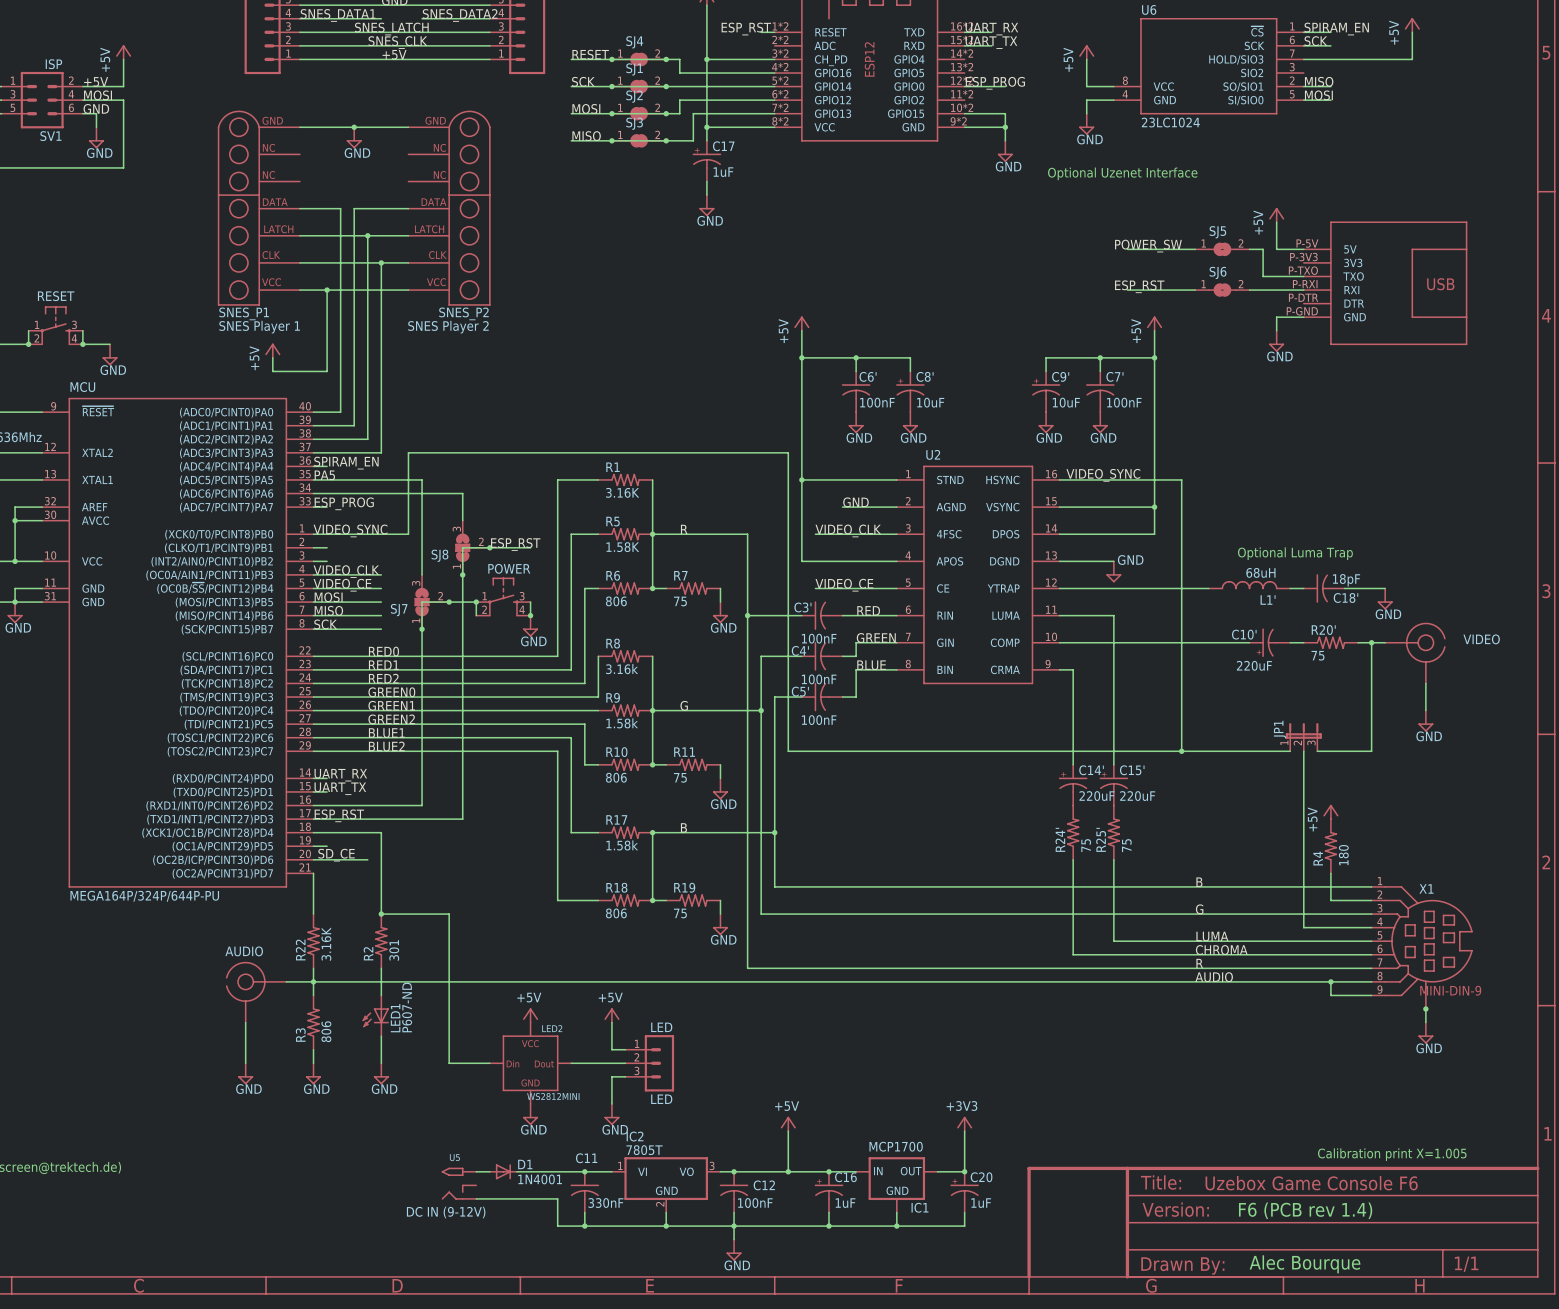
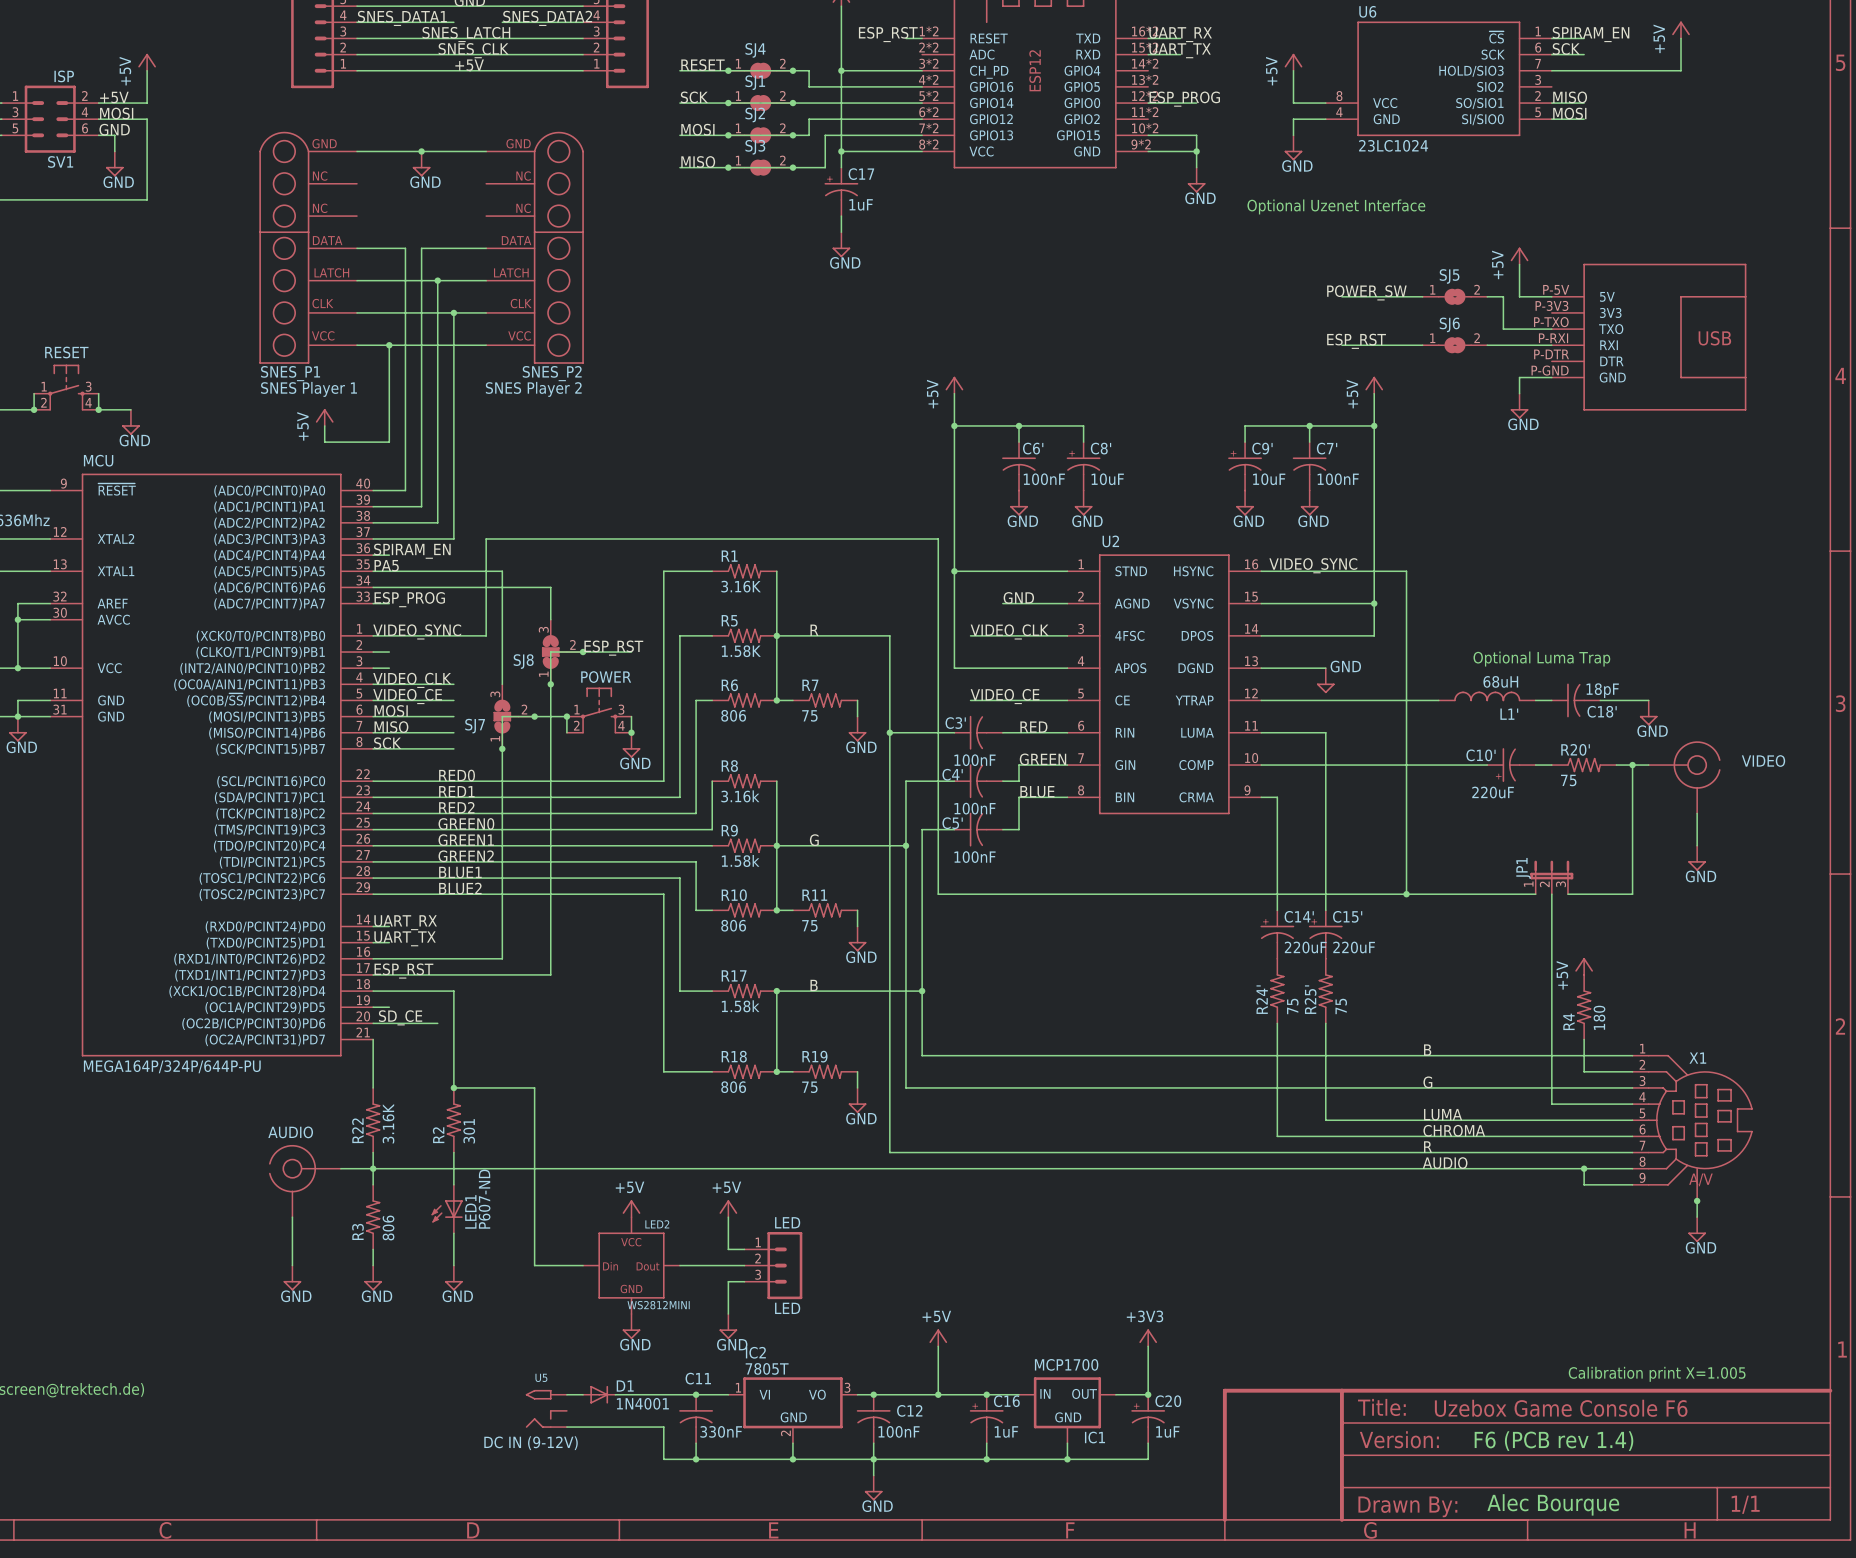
X1 value: MINI-DIN-9 (1450, 990) -> A/V (1700, 1179)

